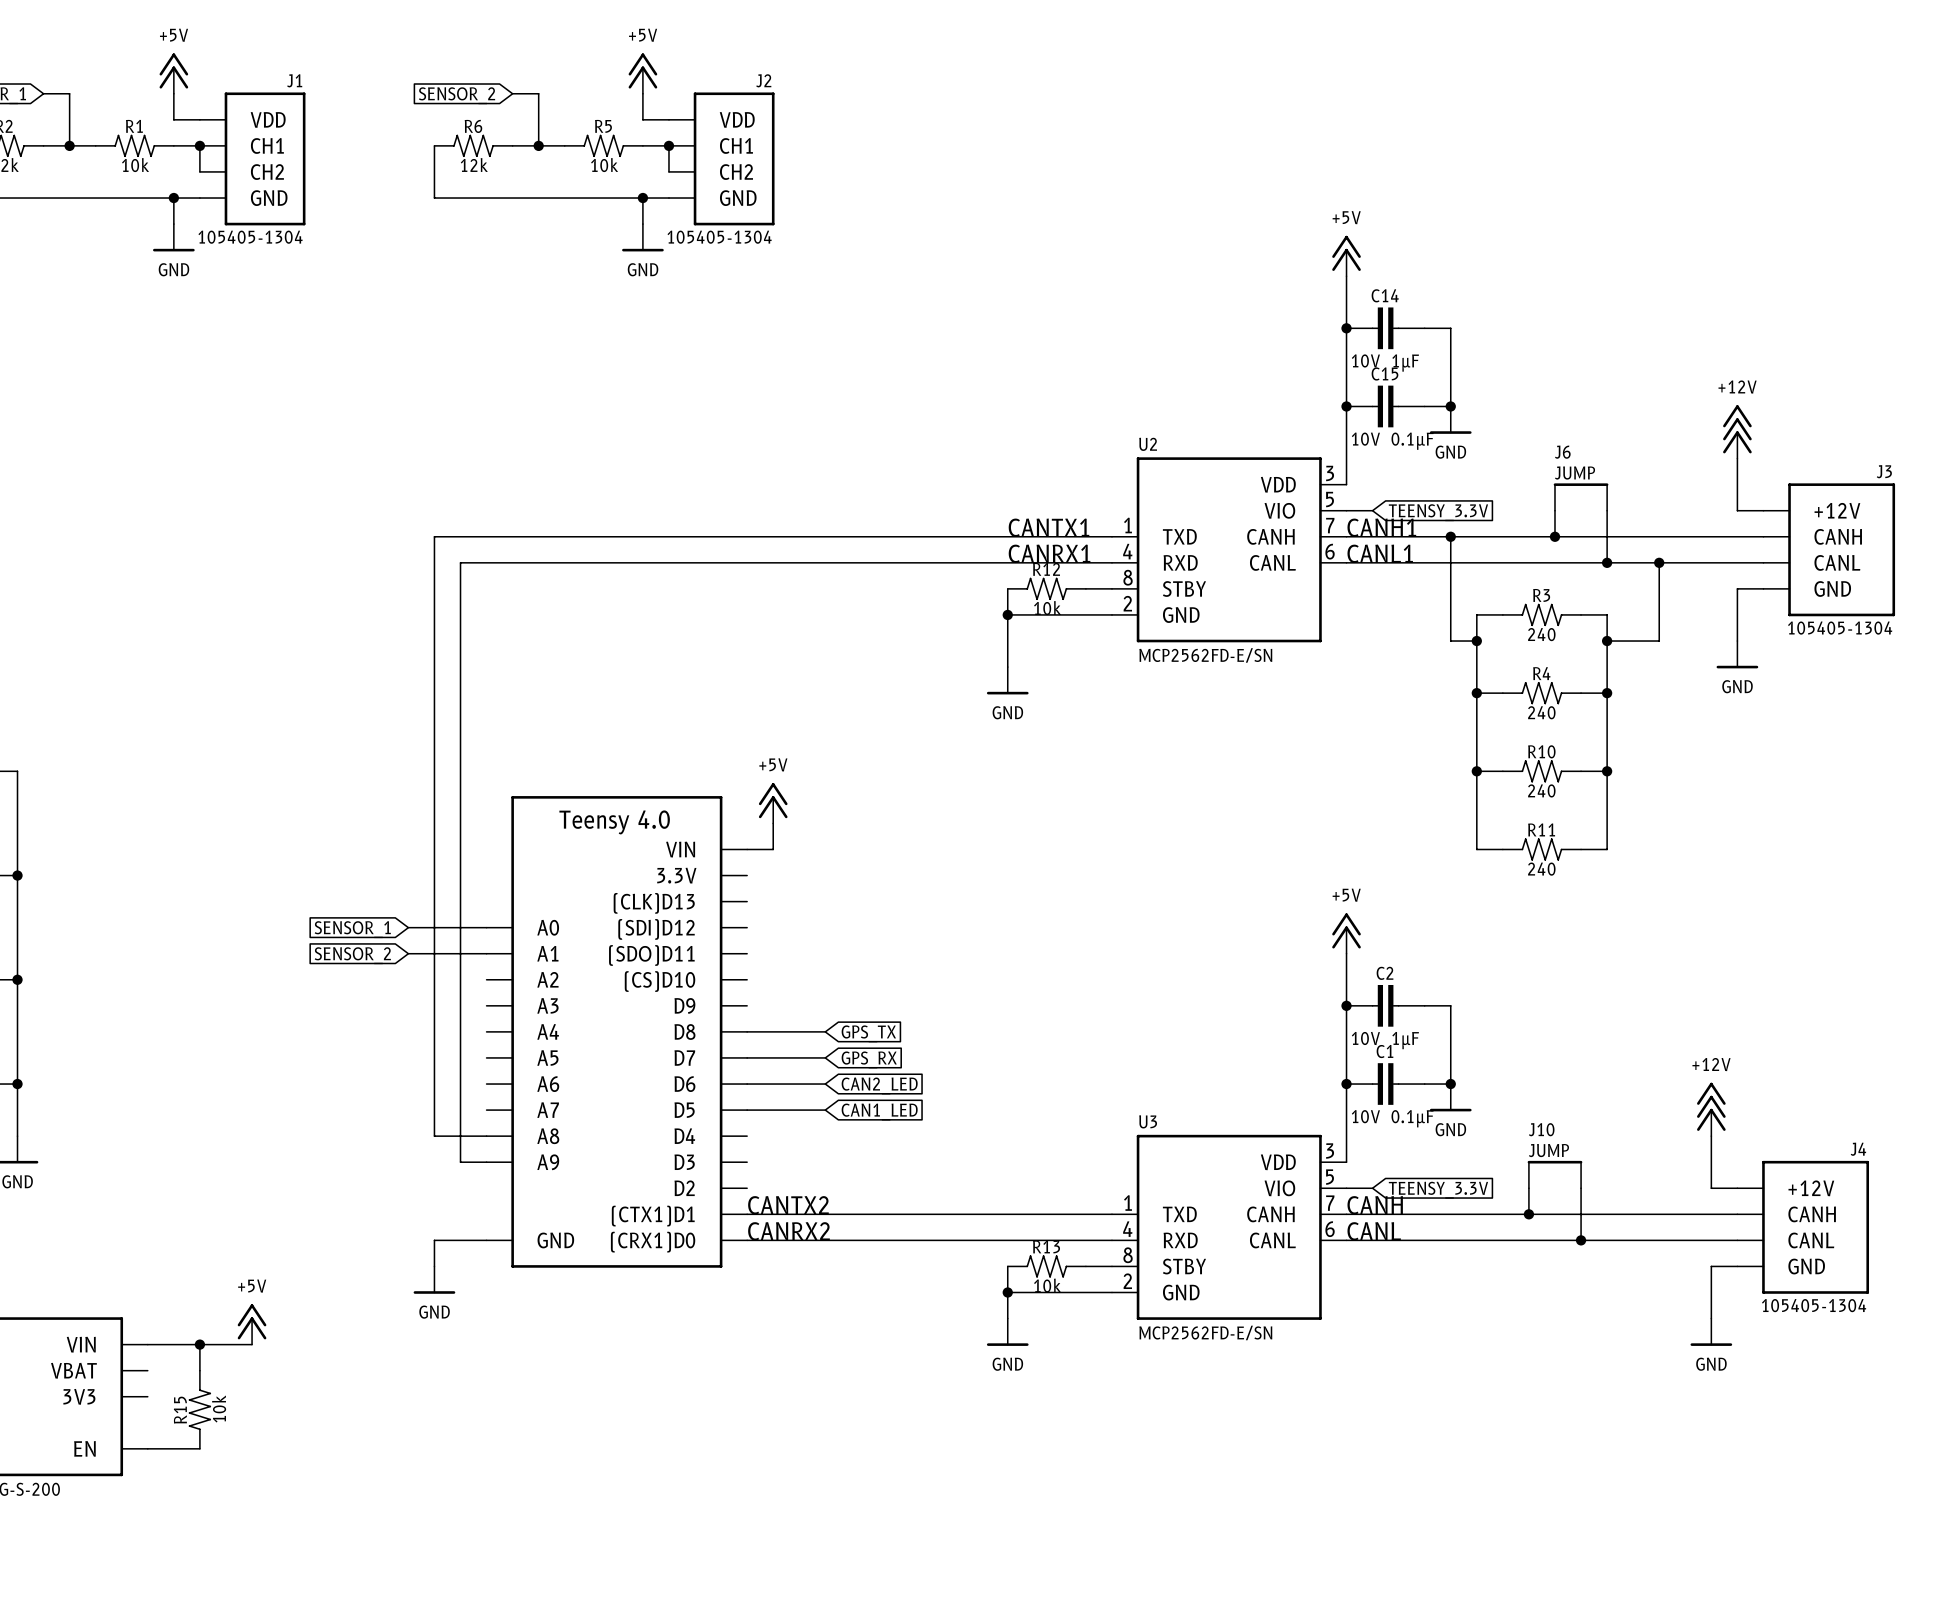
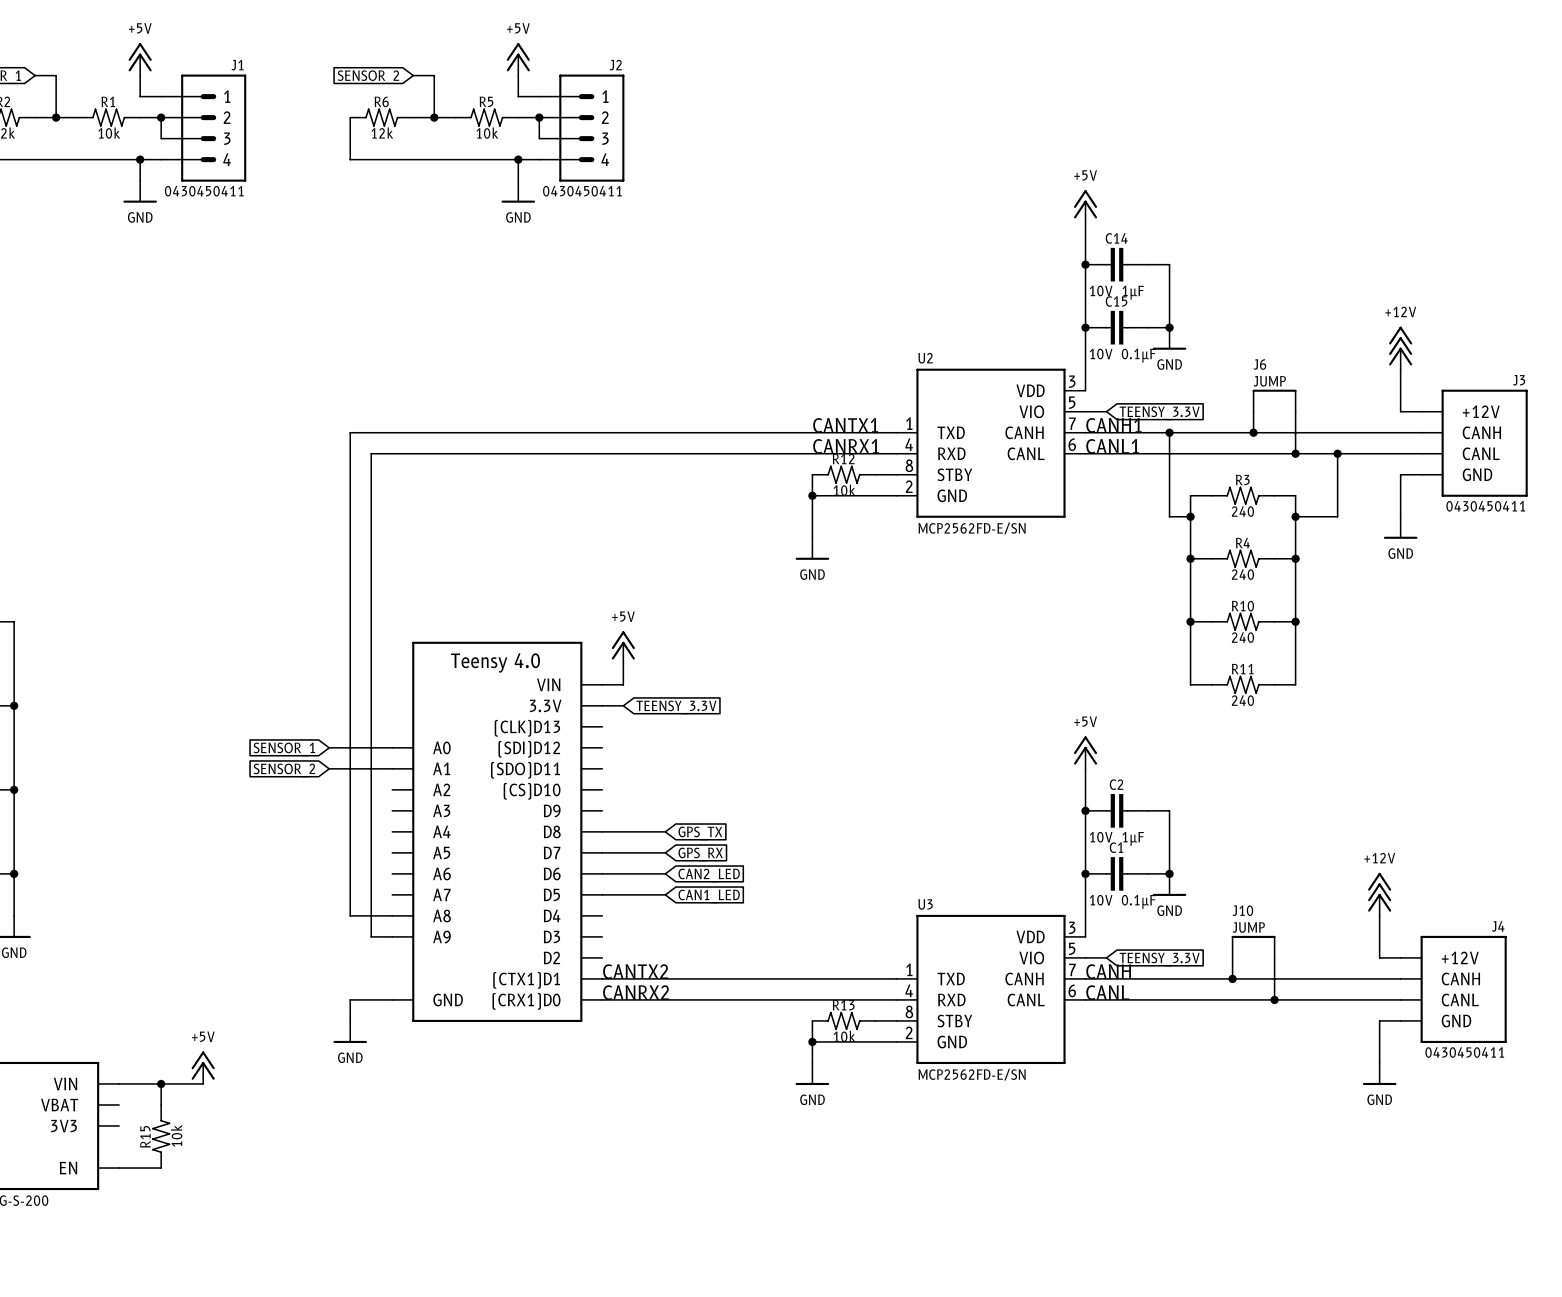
J1 symbol: [199, 92, 306, 226] -> [161, 74, 247, 182]
J2 symbol: [668, 92, 775, 226] -> [539, 74, 625, 182]
J1 text: 105405-1304 (250, 237) -> 0430450411 (204, 191)
J2 text: 105405-1304 (719, 237) -> 0430450411 (582, 191)
J3 text: 105405-1304 (1840, 628) -> 0430450411 (1485, 506)
wire: none -> (602, 705) (623, 705)
global label: none -> TEENSY_3.3V (676, 707)
J4 text: 105405-1304 (1814, 1305) -> 0430450411 (1464, 1052)

